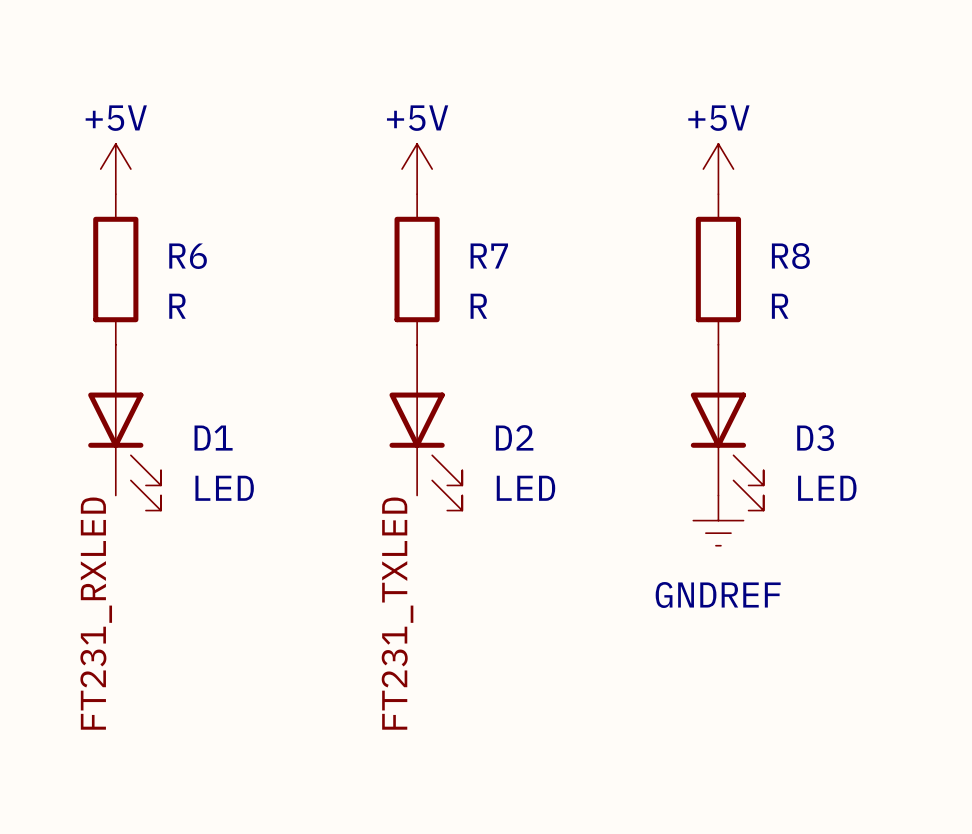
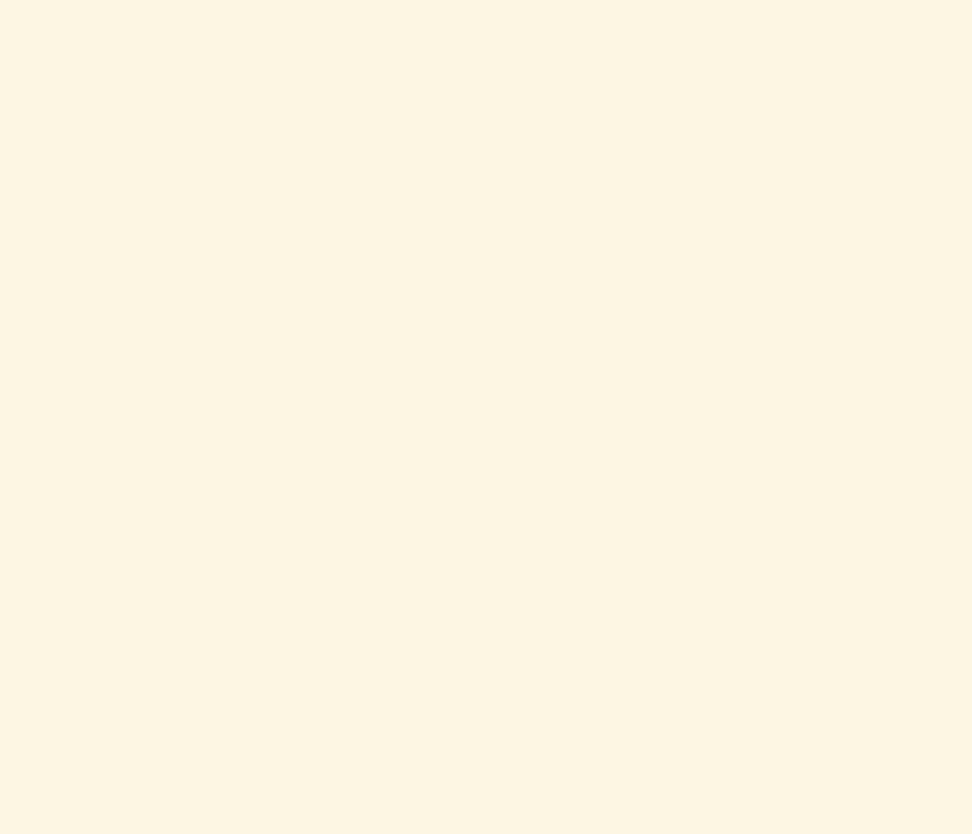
power symbol: +5V (115, 169) -> none
power symbol: +5V (417, 169) -> none
power symbol: +5V (718, 169) -> none
R6: R (115, 269) -> none
R7: R (417, 269) -> none
R8: R (718, 269) -> none
D1: LED (124, 427) -> none
D2: LED (425, 427) -> none
D3: LED (727, 427) -> none
power symbol: GNDREF (718, 520) -> none
label: FT231_RXLED (96, 613) -> none
label: FT231_TXLED (397, 613) -> none

